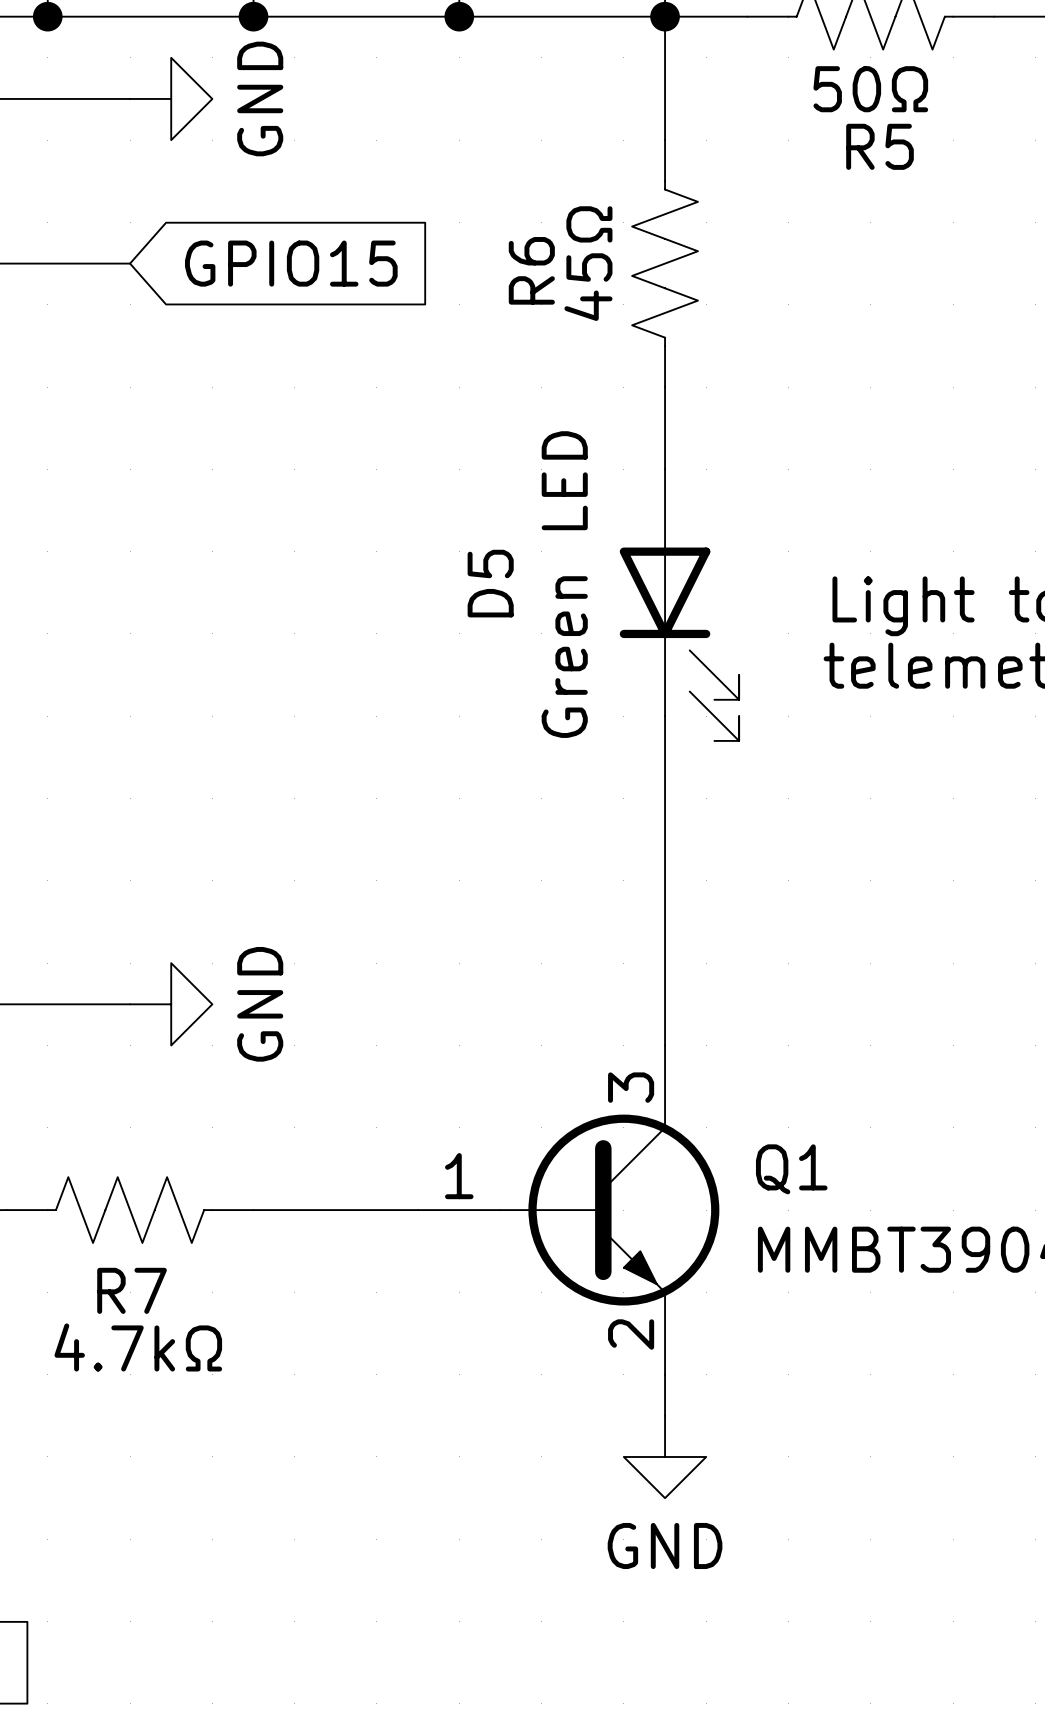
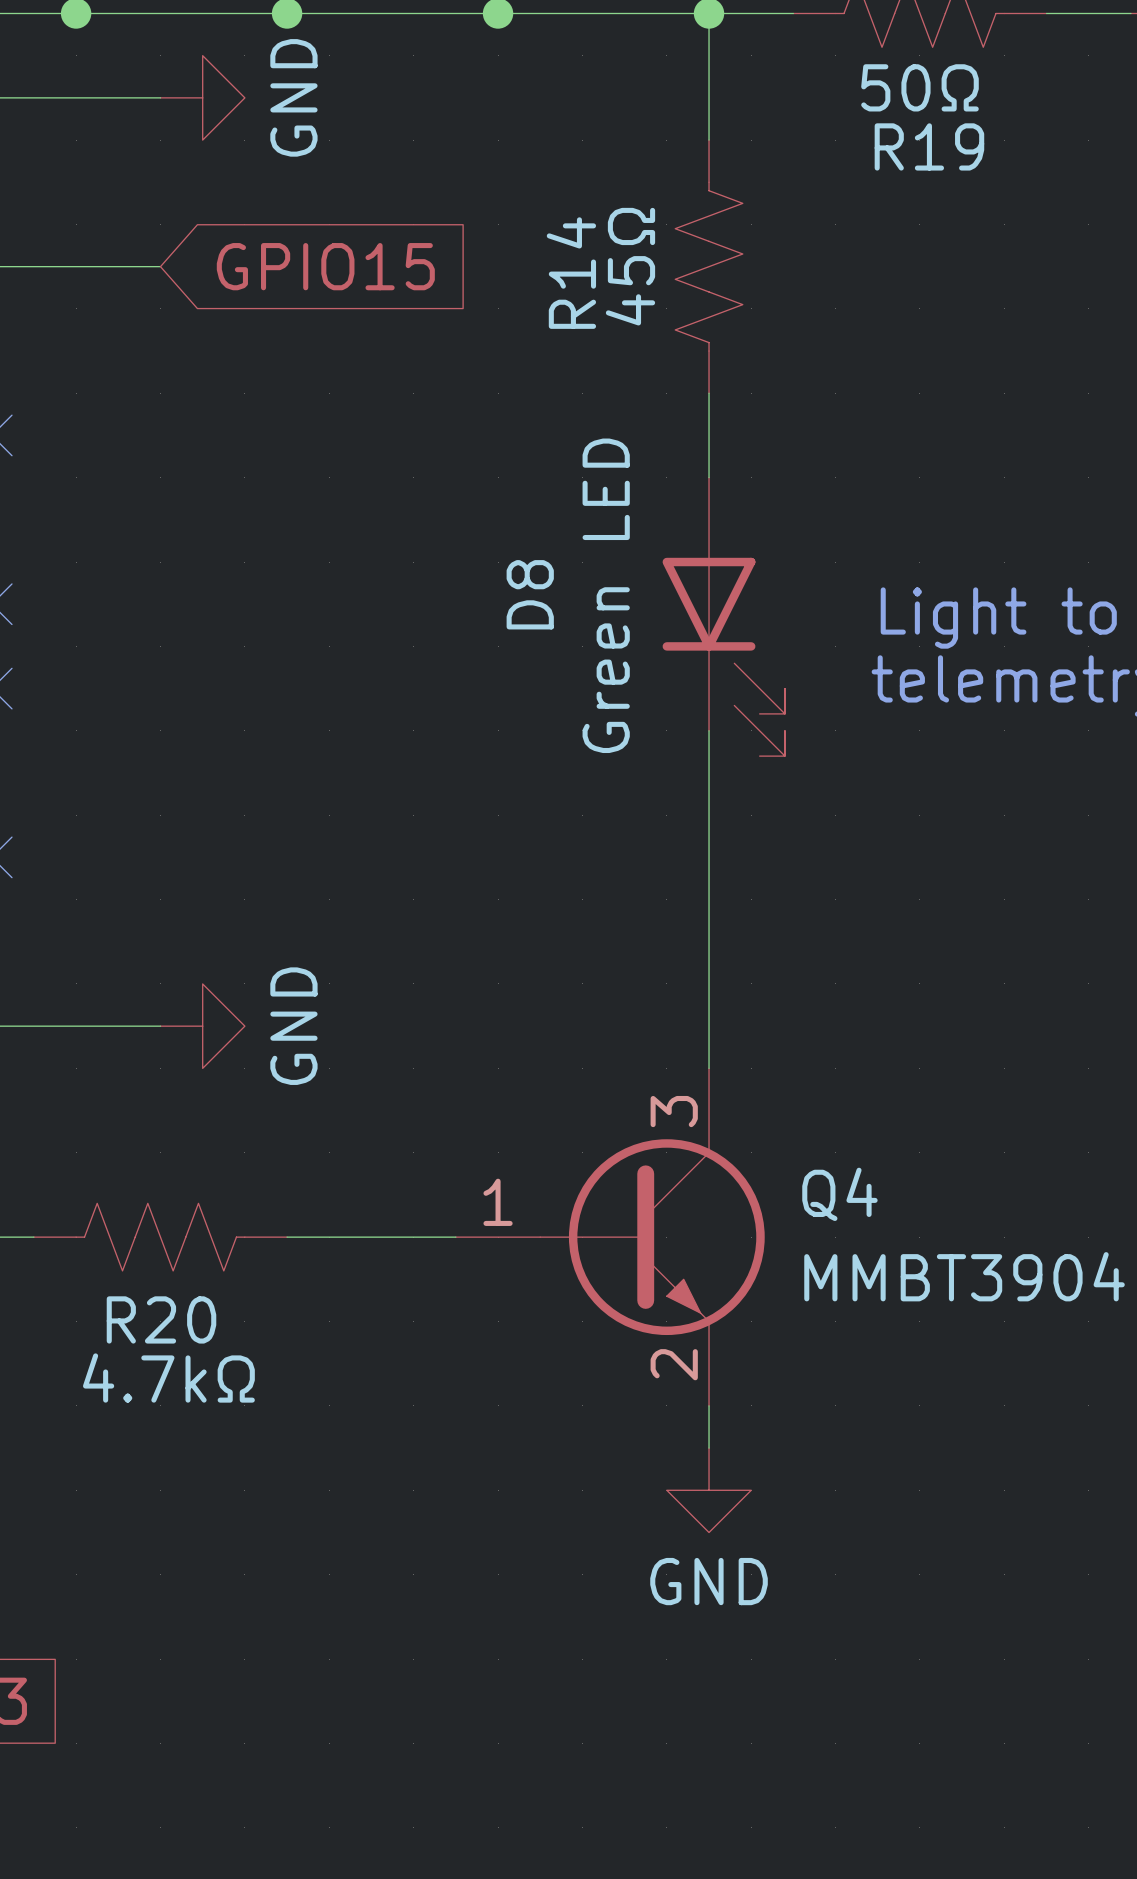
R5 name: R5 (880, 146) -> R19 (929, 146)
R6 name: R6 (531, 270) -> R14 (571, 273)
D5 name: D5 (490, 583) -> D8 (530, 594)
Q1 name: Q1 (791, 1169) -> Q4 (839, 1194)
R7 name: R7 (132, 1290) -> R20 (161, 1319)

